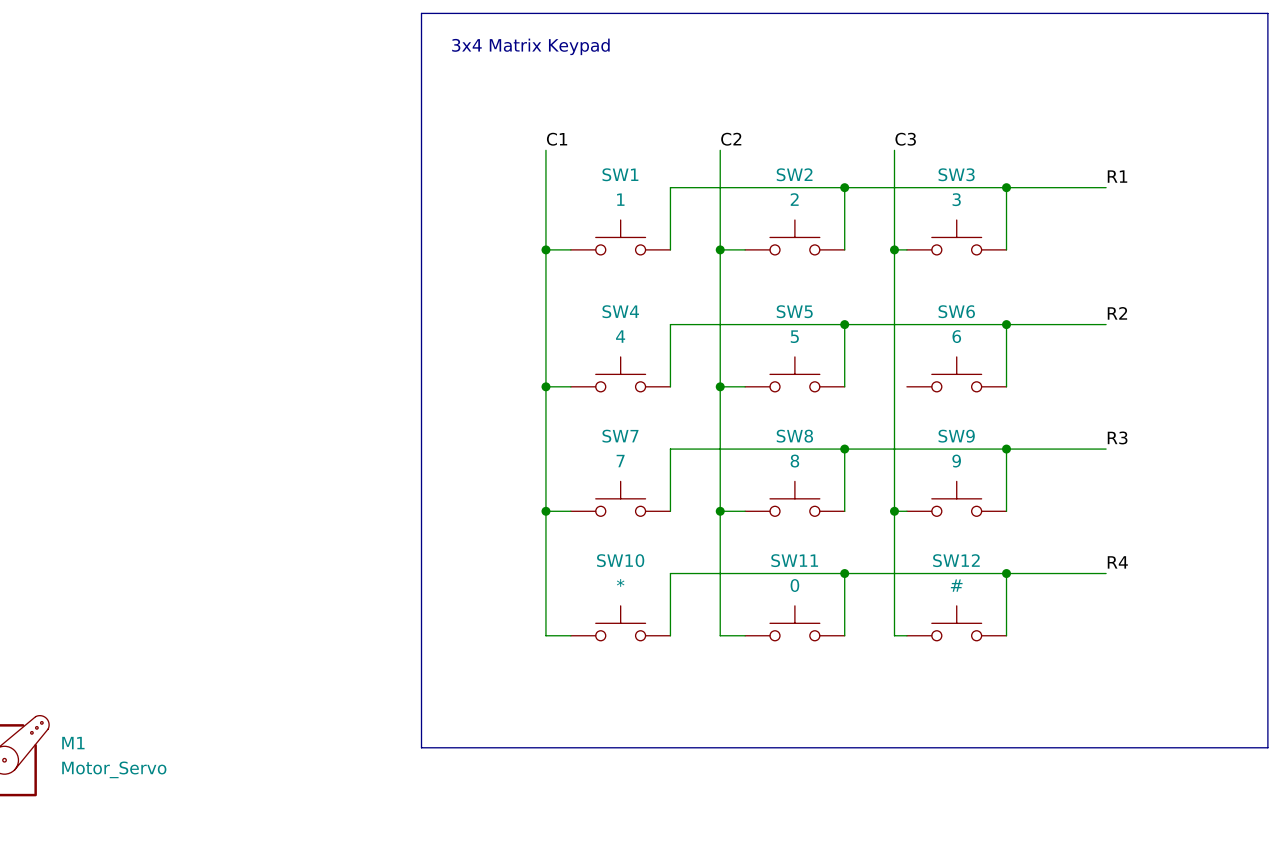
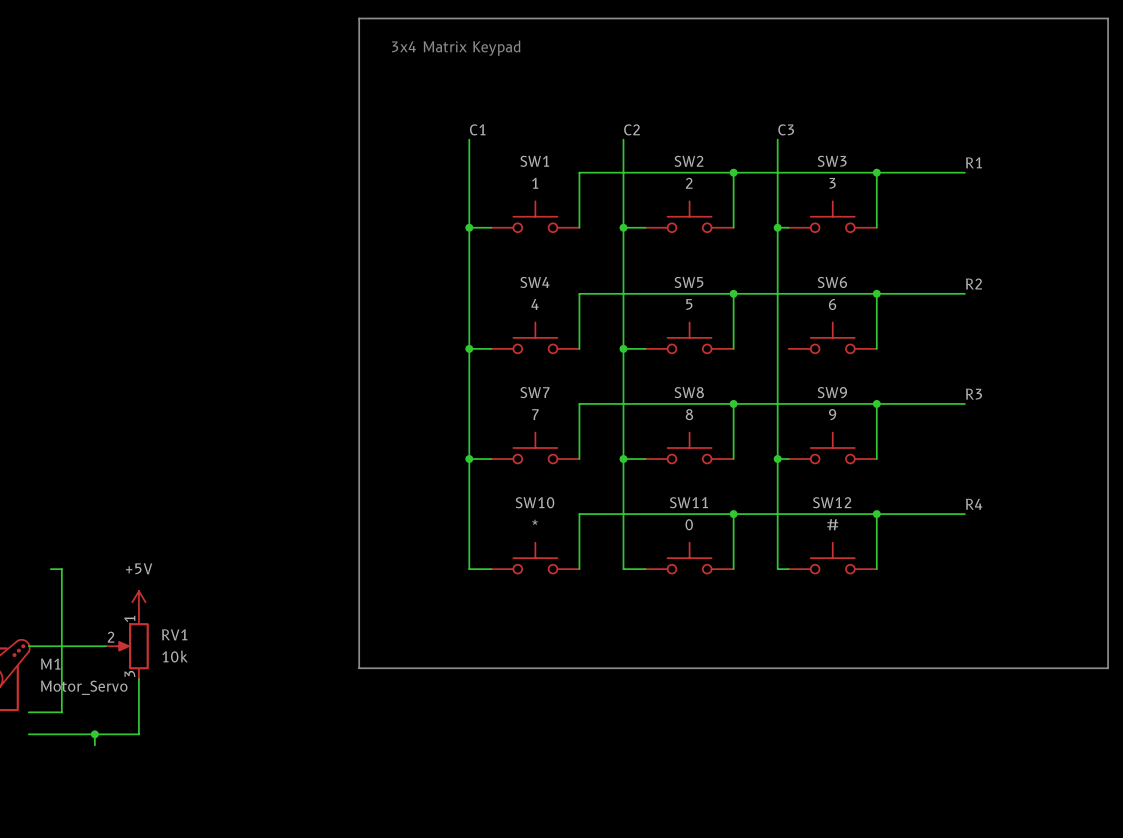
wire: none -> (50, 569) (61, 569) (61, 712) (28, 712)
power symbol: none -> +5V (138, 602)
wire: none -> (28, 646) (105, 646)
RV1: none -> 10k (127, 646)
wire: none -> (138, 679) (138, 734) (28, 734)
wire: none -> (94, 734) (94, 745)
junction: none -> (94, 734)

